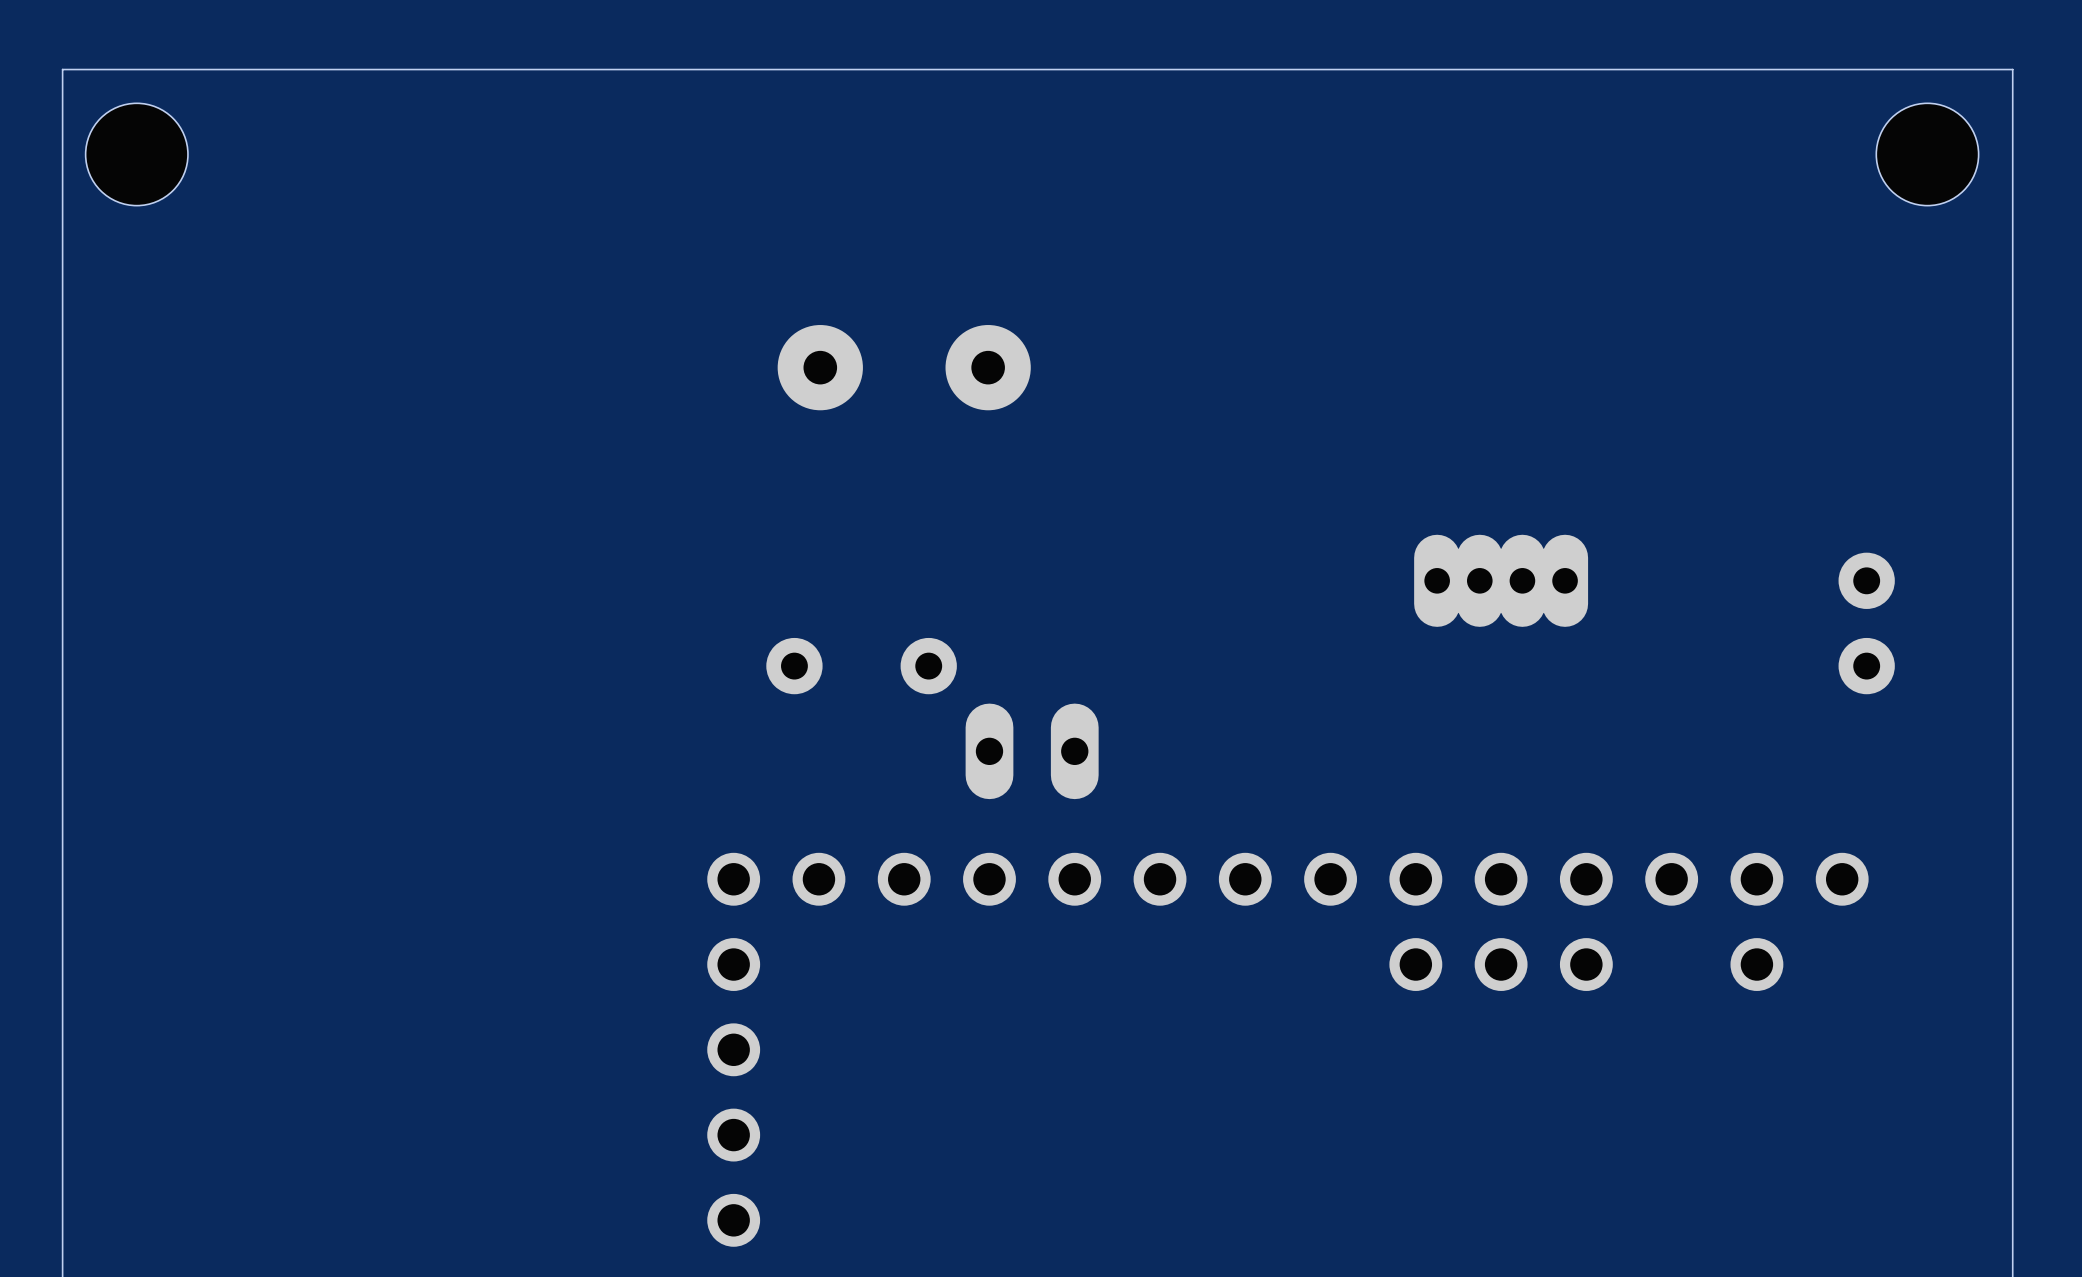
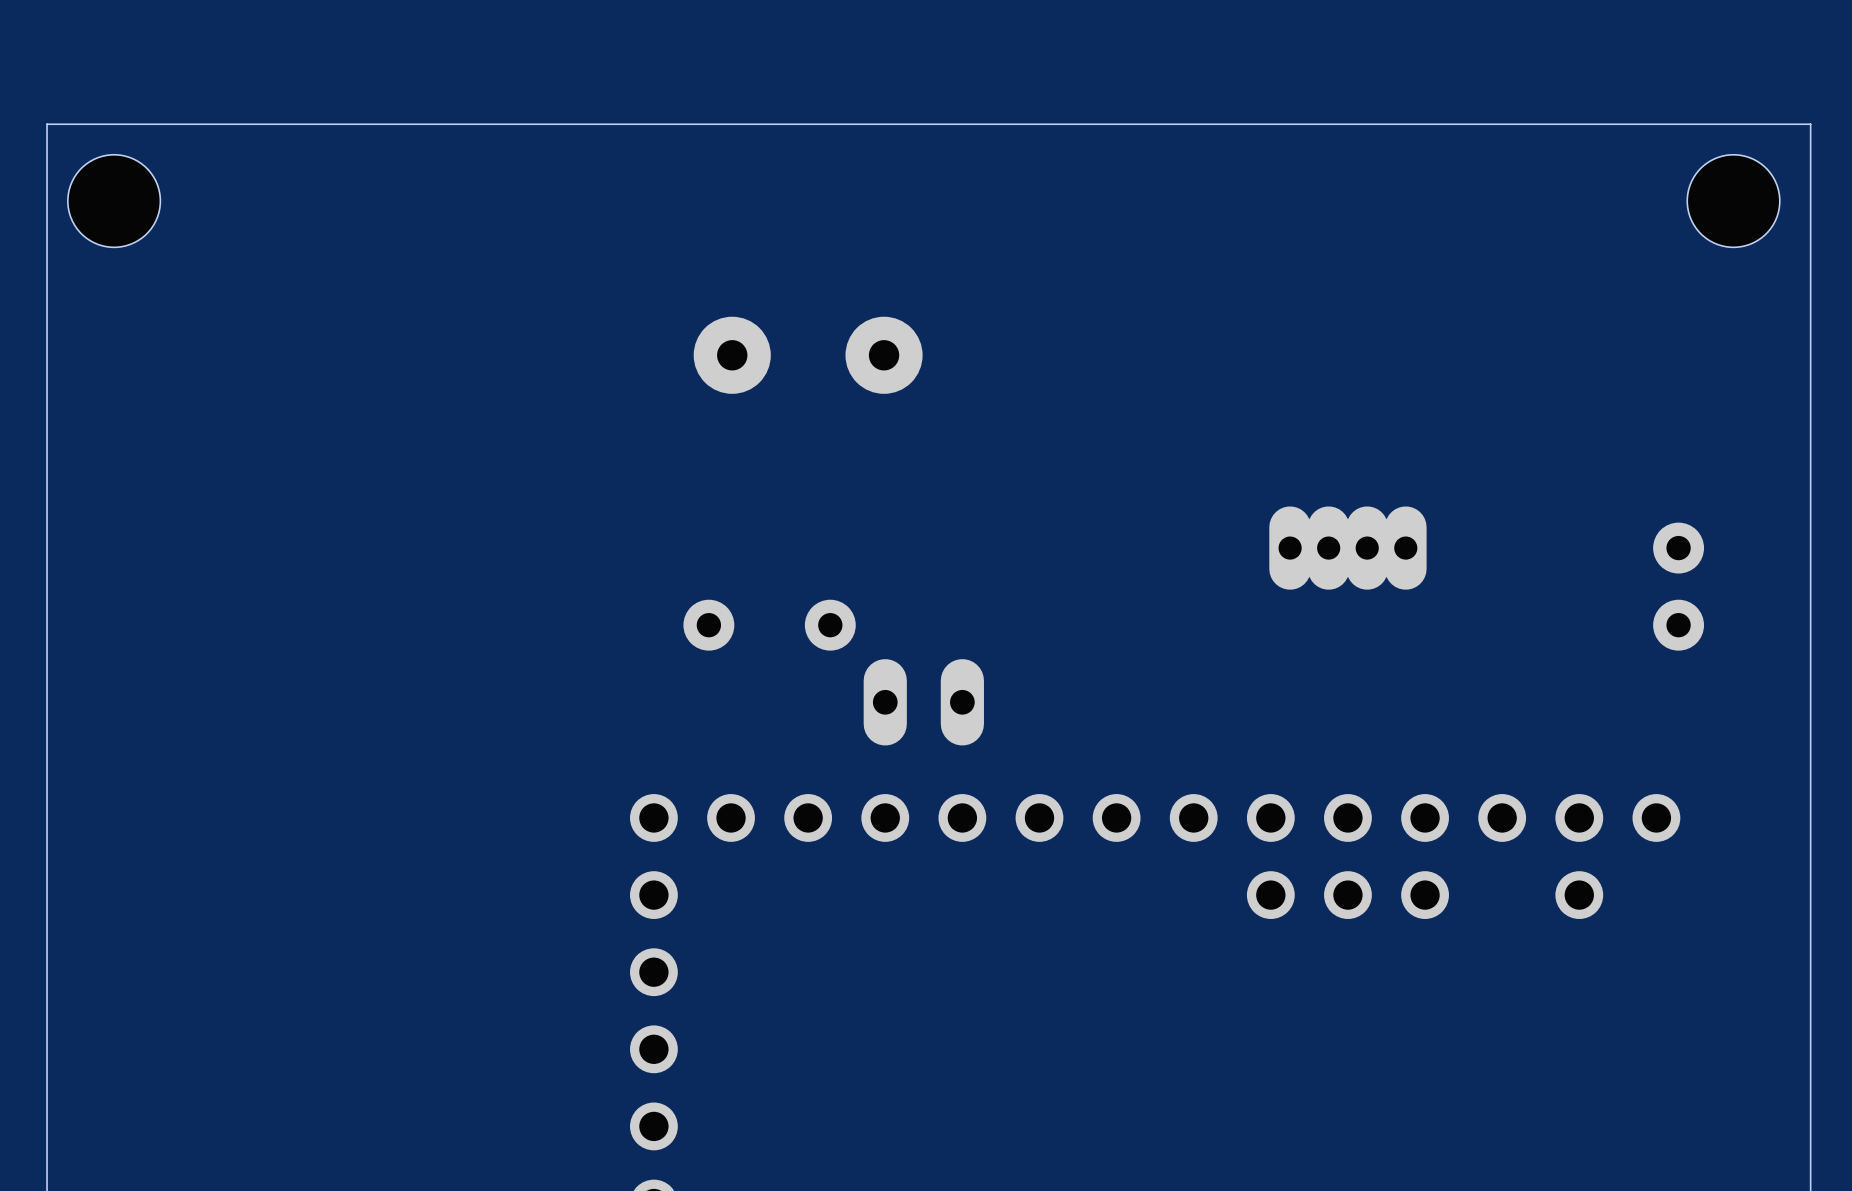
board edge: (2012, 112) (2012, 69) (62, 69) (62, 112) -> (1810, 124) (47, 124)
hole position: (136, 154) -> (114, 201)
hole position: (1927, 154) -> (1733, 201)

